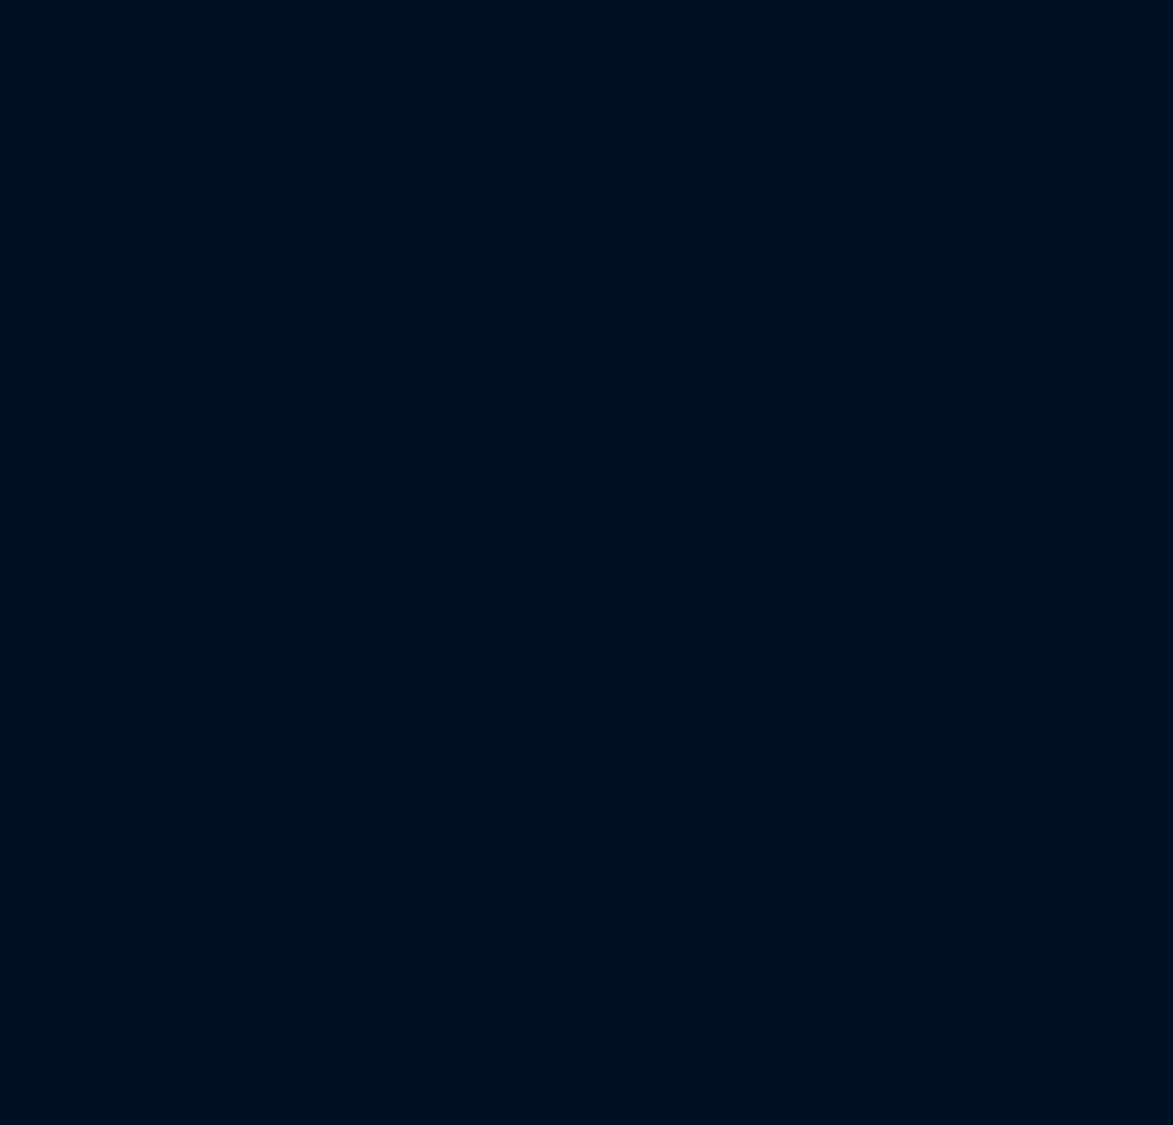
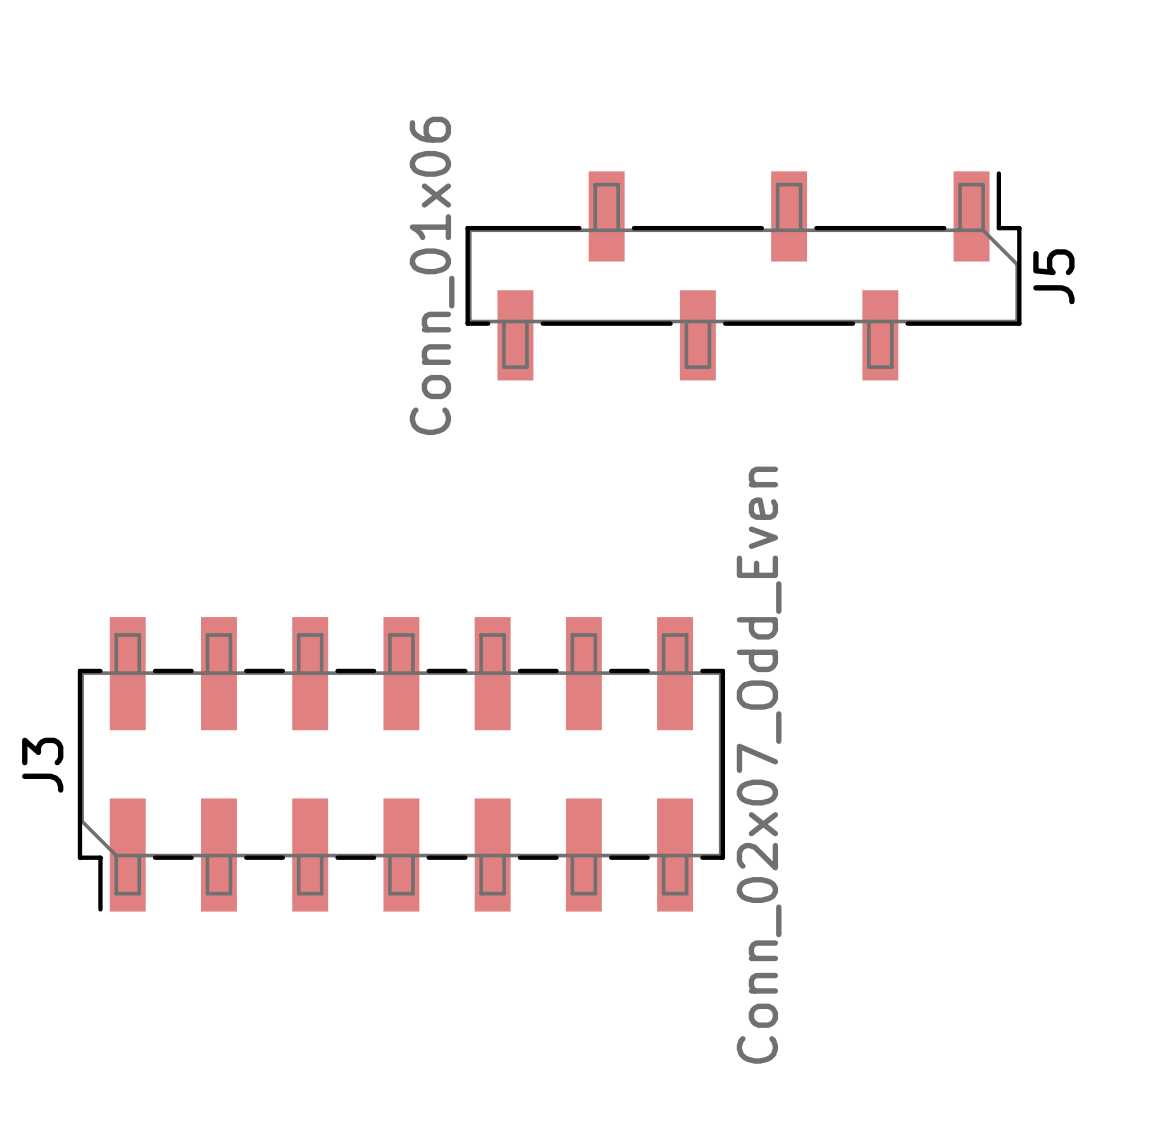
J5: none -> Conn_01x06 (743, 275)
J3: none -> Conn_02x07_Odd_Even (401, 764)

